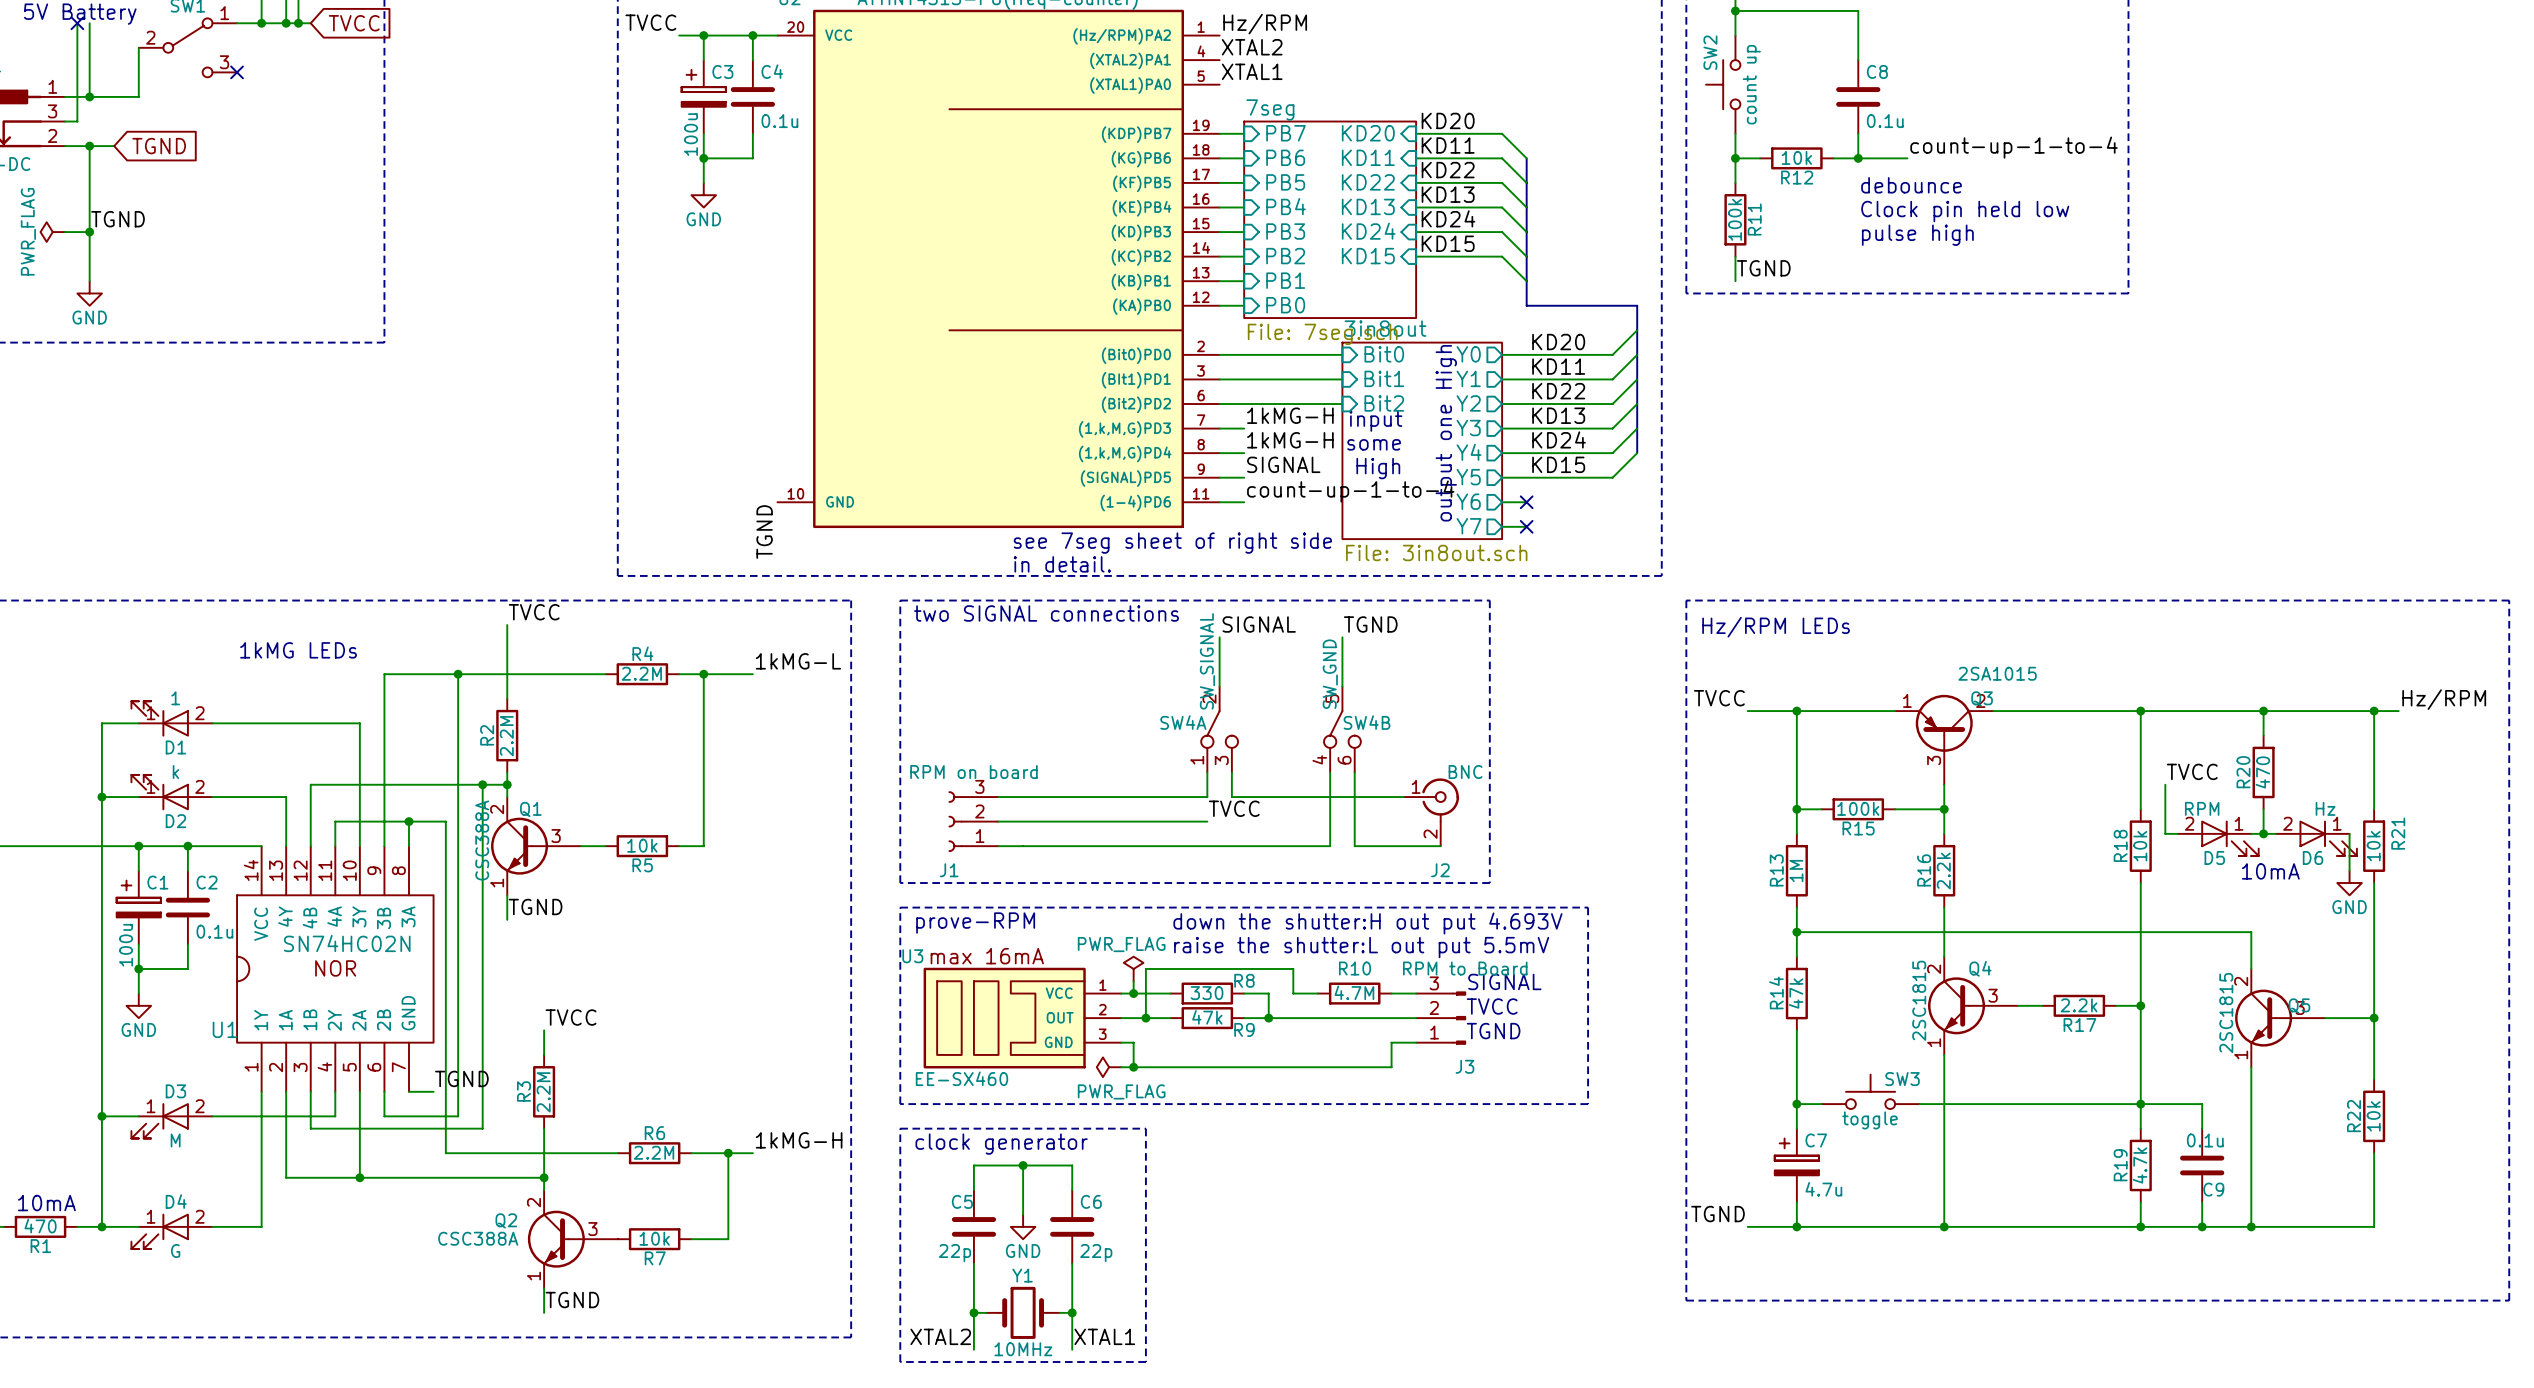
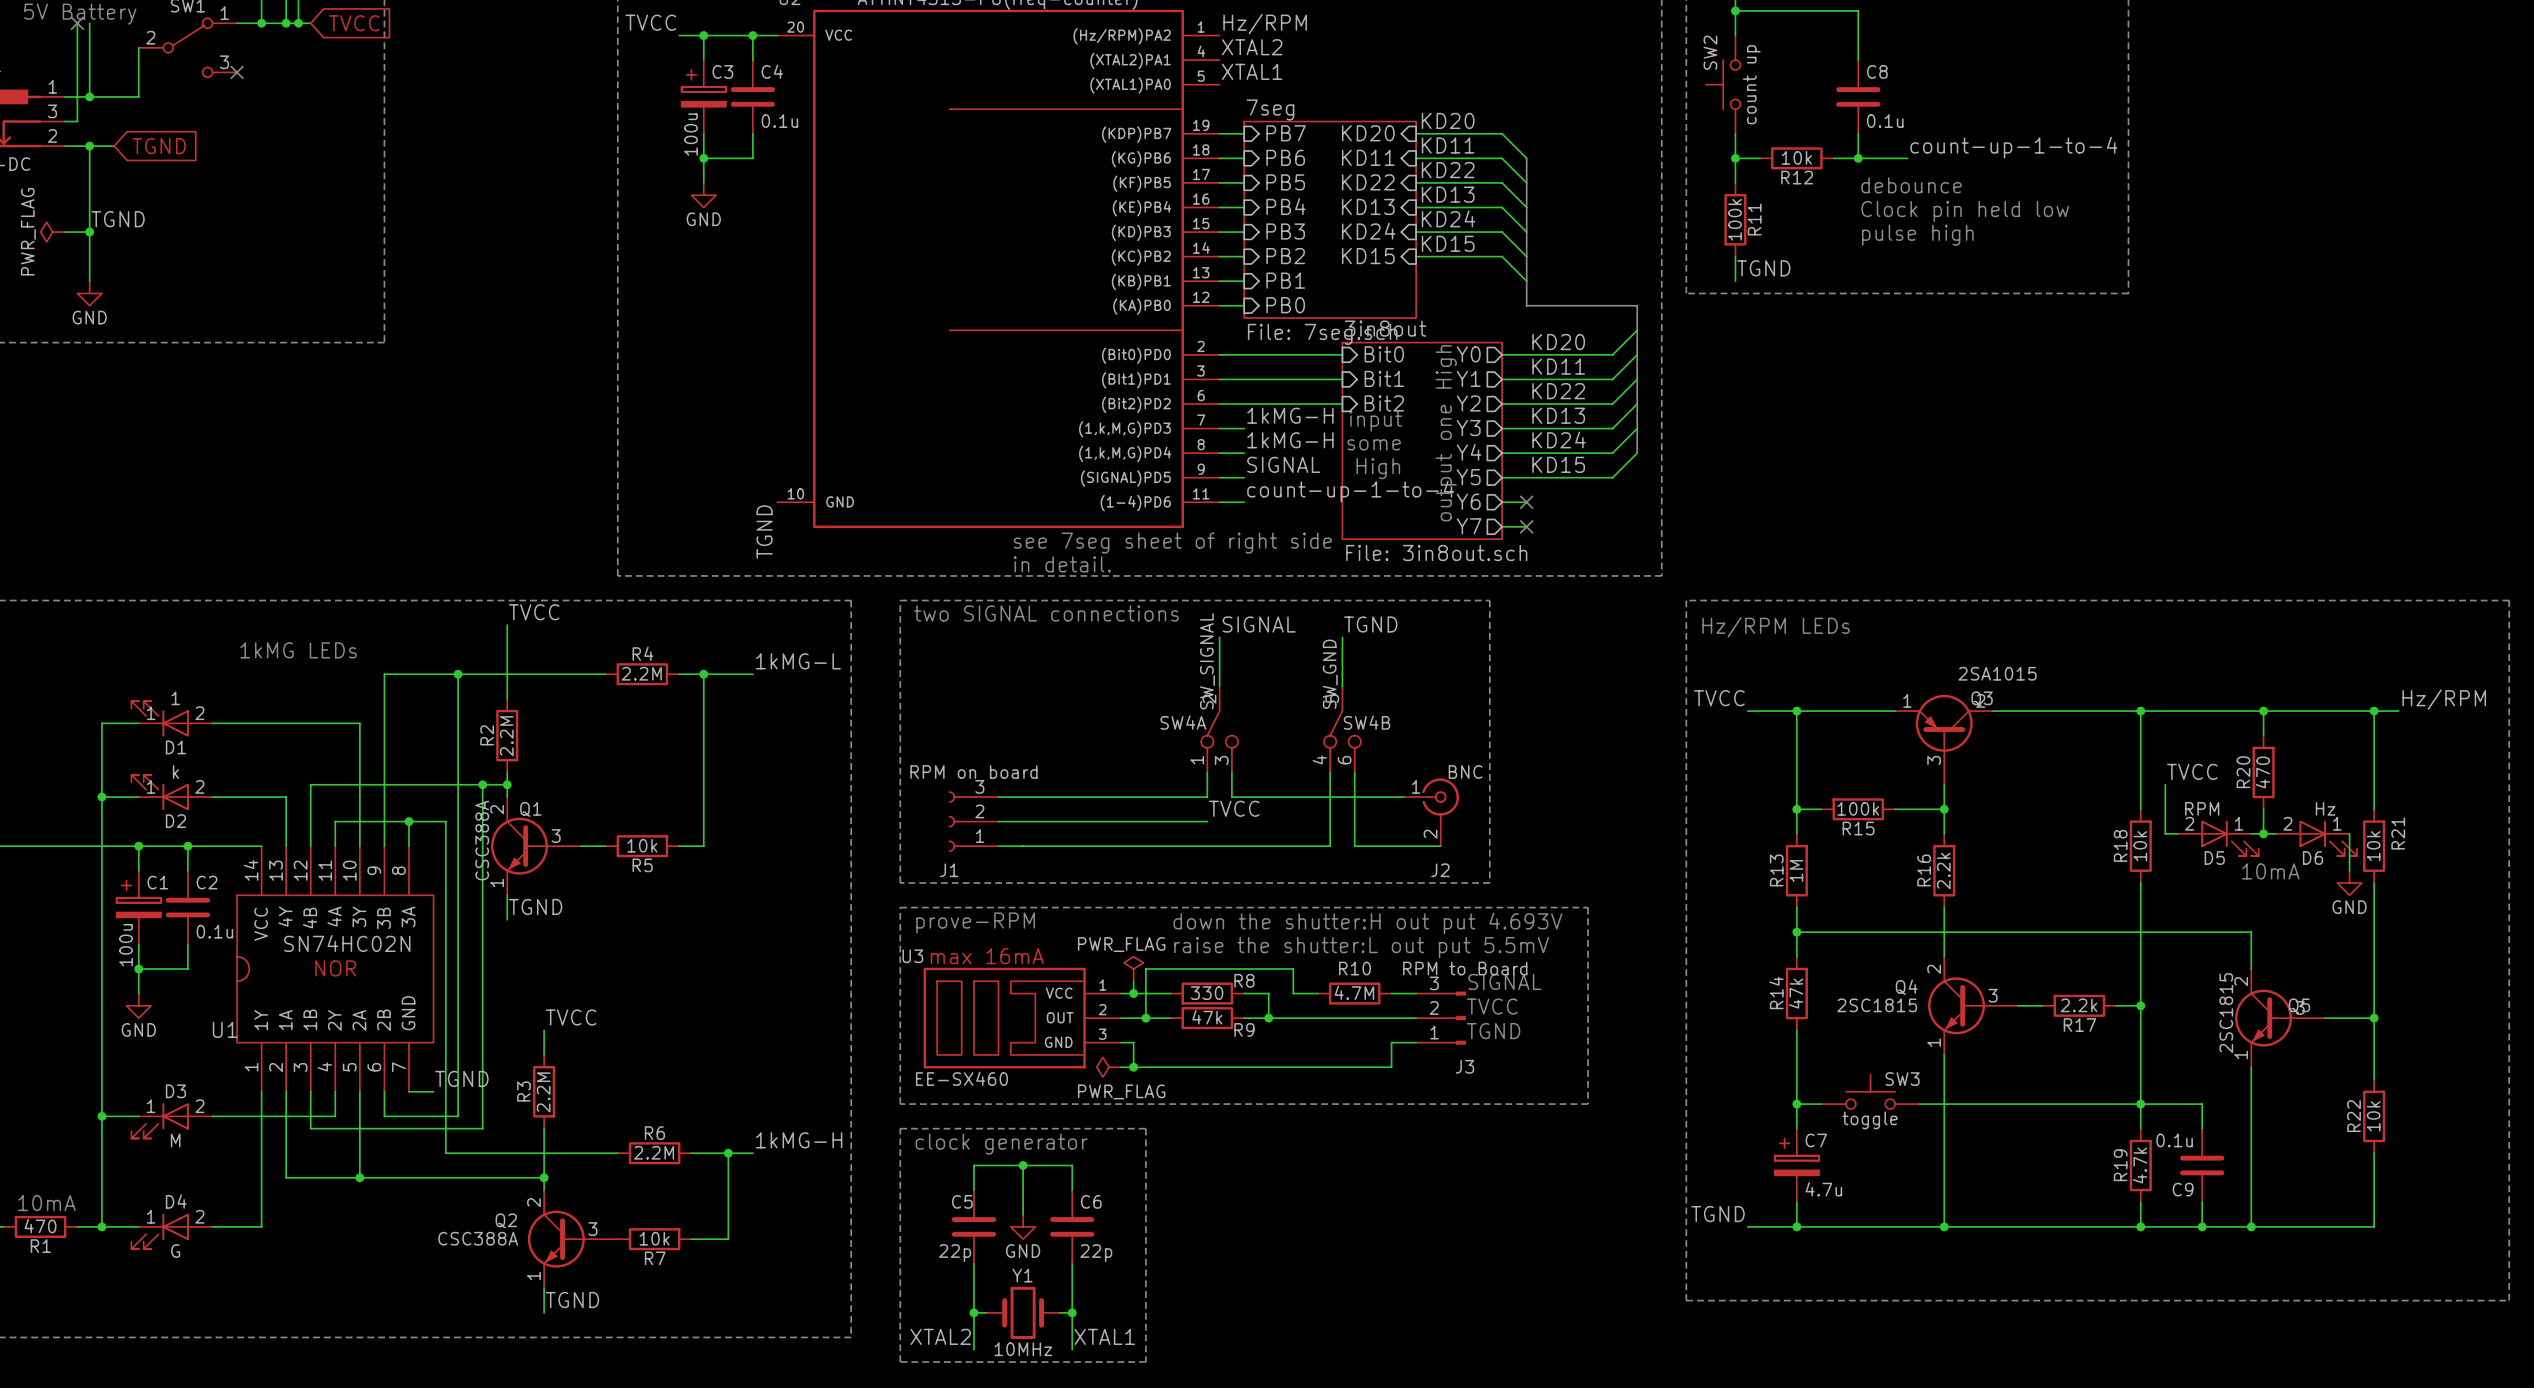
Q4 name position: Q4 (1980, 968) -> Q4 (1906, 987)
Q4 value rotation: 0° (1919, 1000) -> 90° clockwise (1877, 1005)
C9 value position: 0.1u (2205, 1140) -> 0.1u (2174, 1140)
C9 name position: C9 (2213, 1189) -> C9 (2183, 1189)

